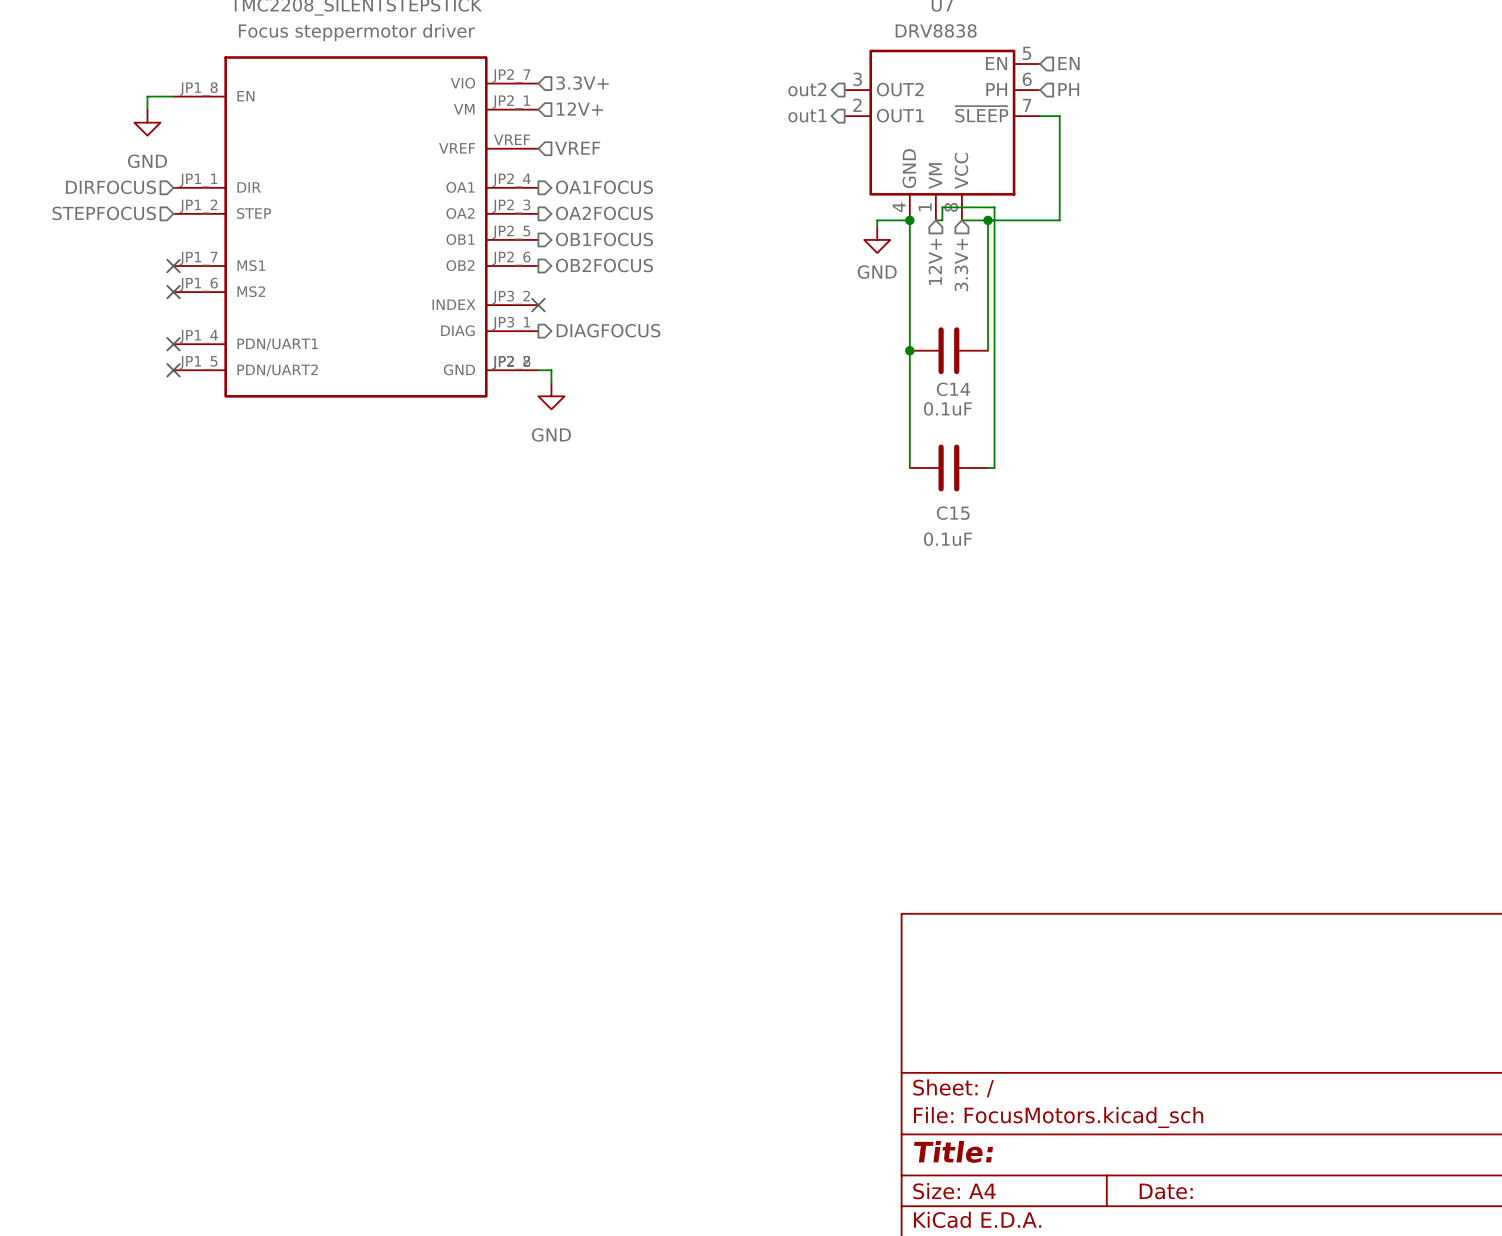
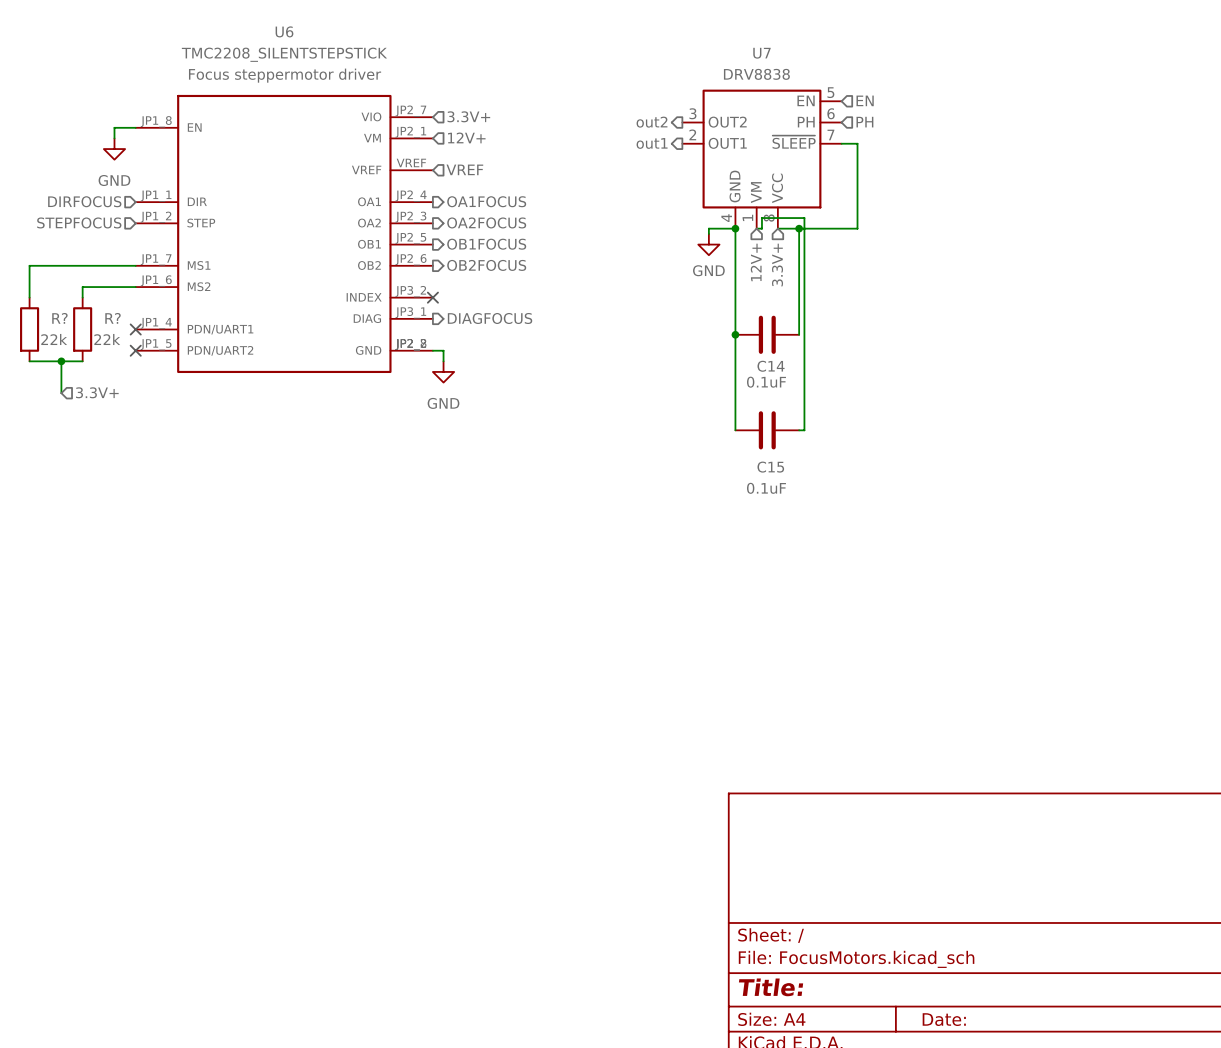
wire: none -> (135, 265) (29, 265) (29, 297)
no-connect mark: (173, 266) -> none
wire: none -> (135, 287) (82, 287) (82, 297)
no-connect mark: (173, 292) -> none
R?: none -> 22k (29, 329)
R?: none -> 22k (82, 329)
wire: none -> (29, 361) (82, 361)
wire: none -> (61, 361) (61, 393)
junction: none -> (61, 361)
hierarchical label: none -> 3.3V+ (97, 392)

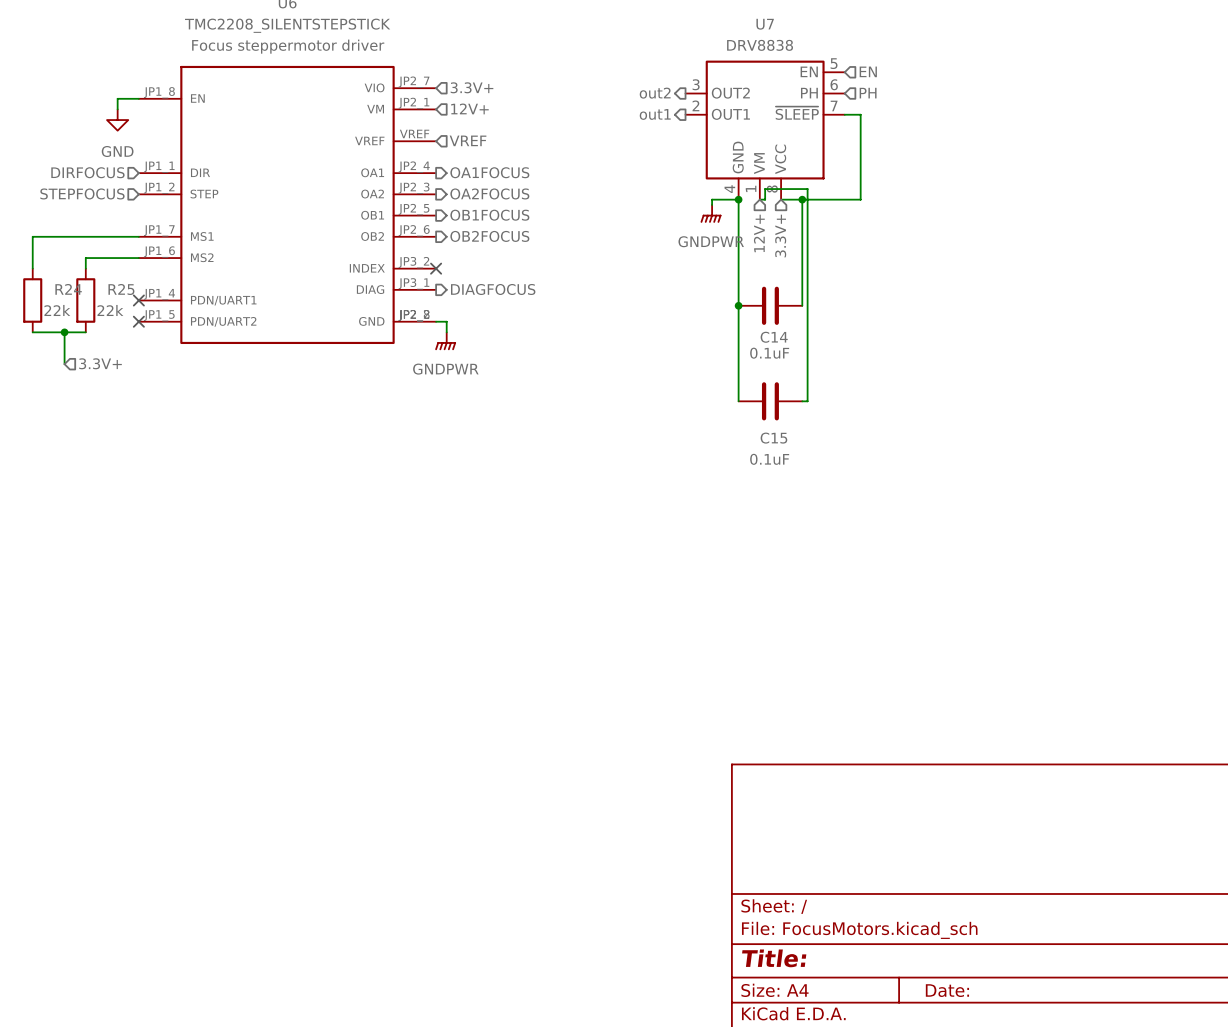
power symbol: GND (708, 244) -> GNDPWR (711, 213)
R? name: R? (59, 318) -> R24 (68, 289)
R? name: R? (113, 318) -> R25 (121, 289)
power symbol: GND (443, 371) -> GNDPWR (445, 341)

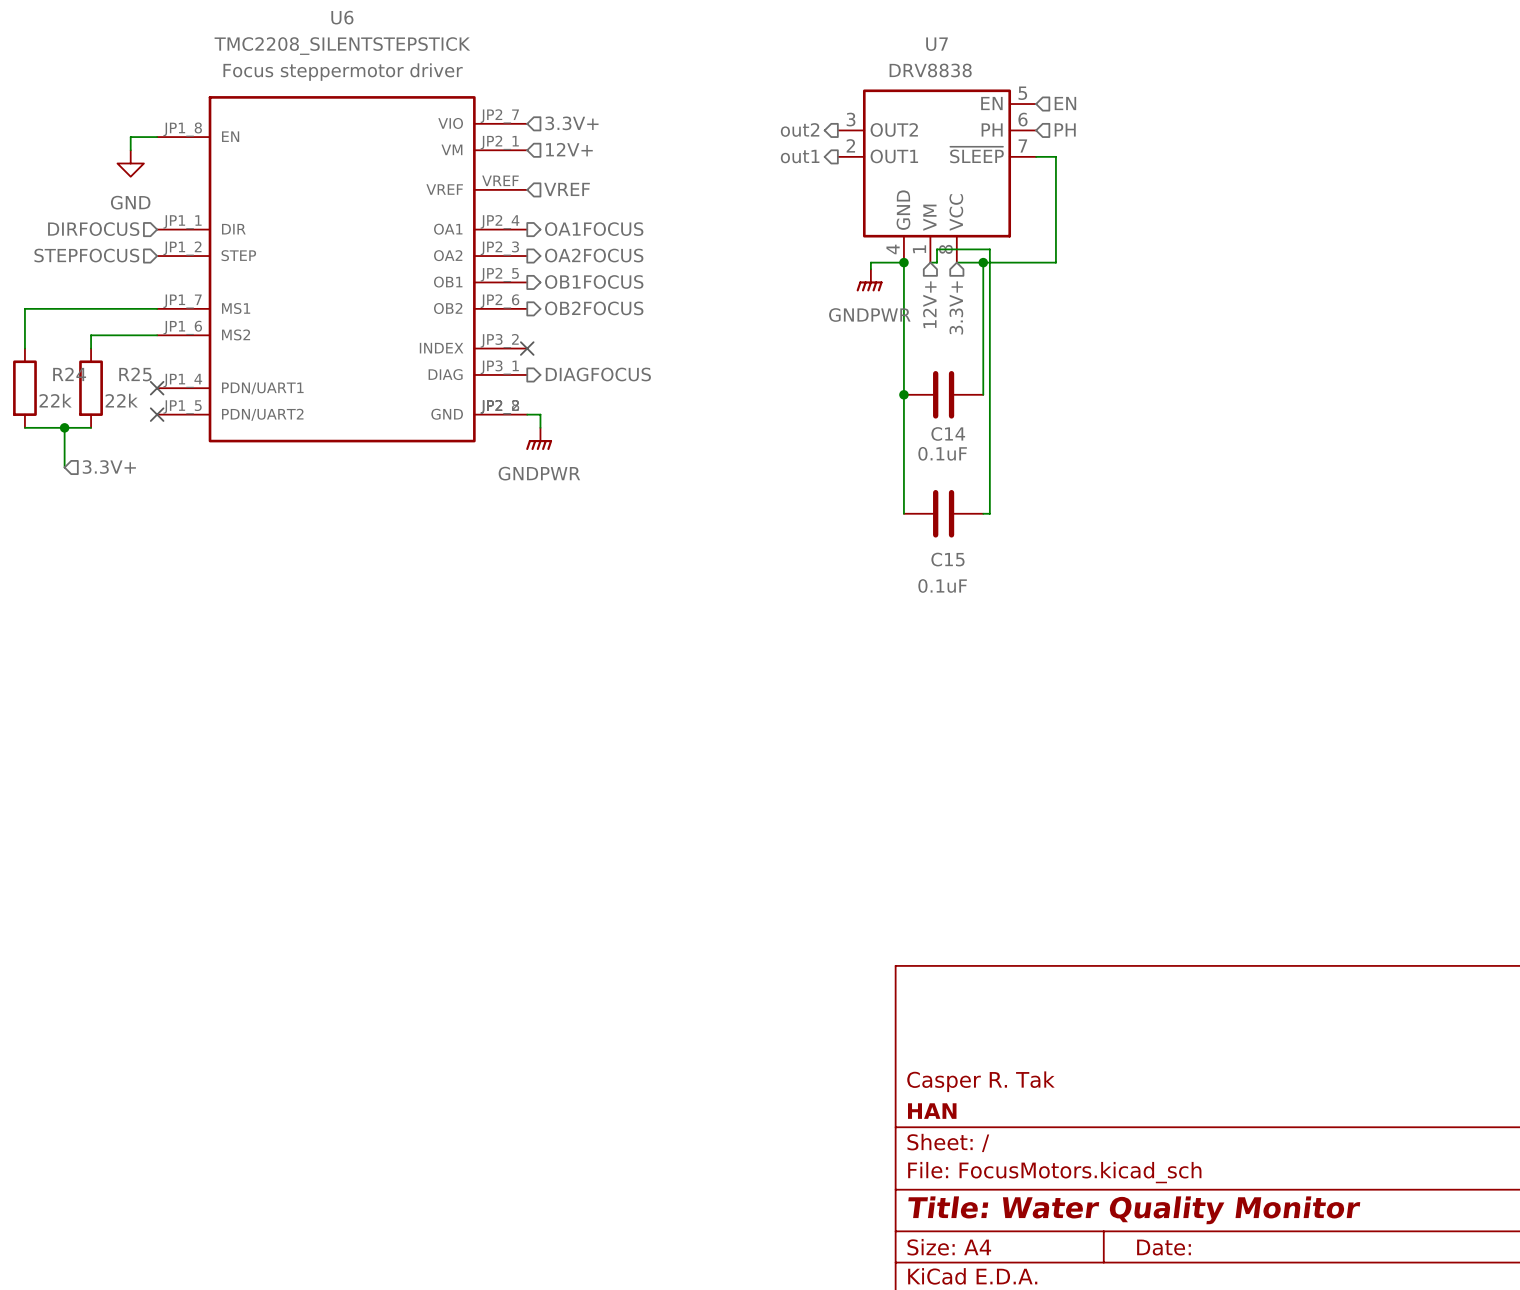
title block: none -> Casper R. Tak (980, 1081)
title block: none -> HAN (932, 1111)
title block: Title: (774, 958) -> Title: Water Quality Monitor (1134, 1210)

